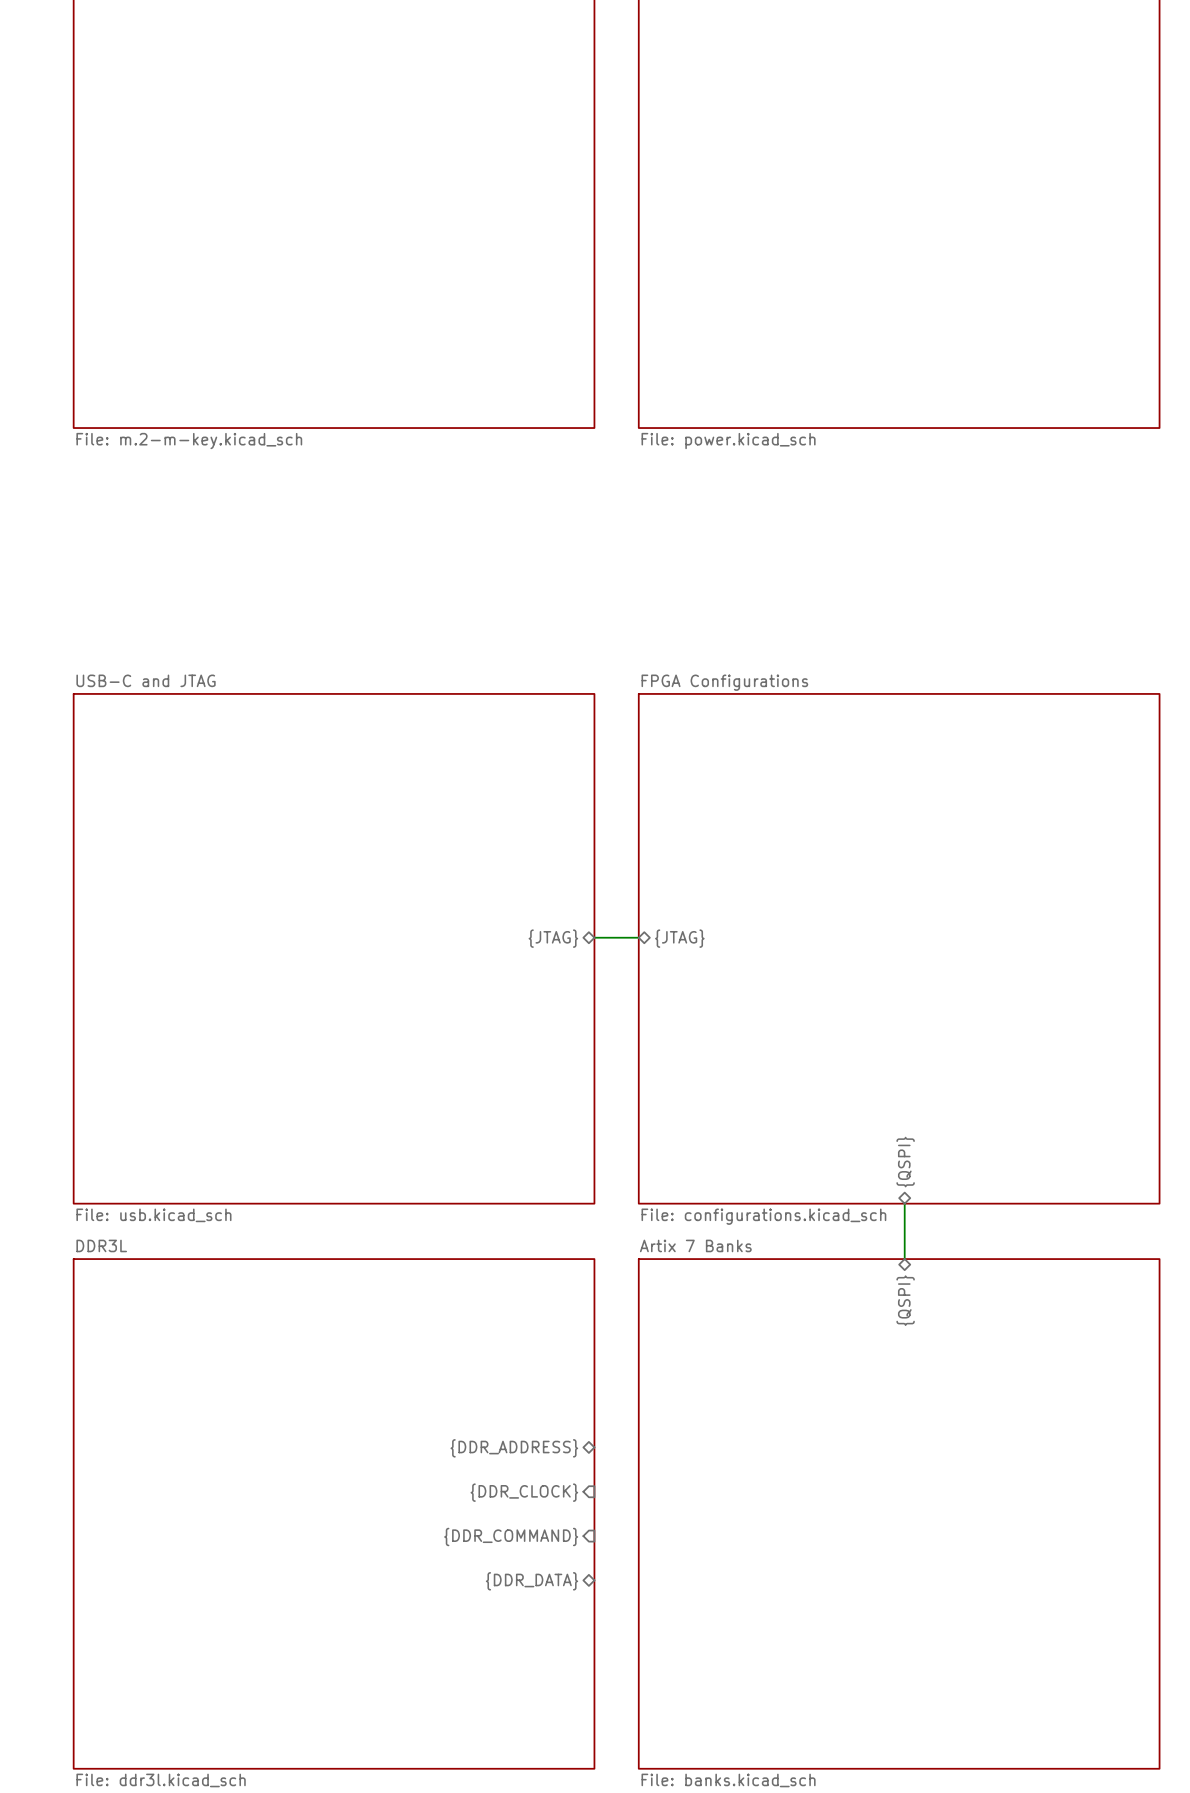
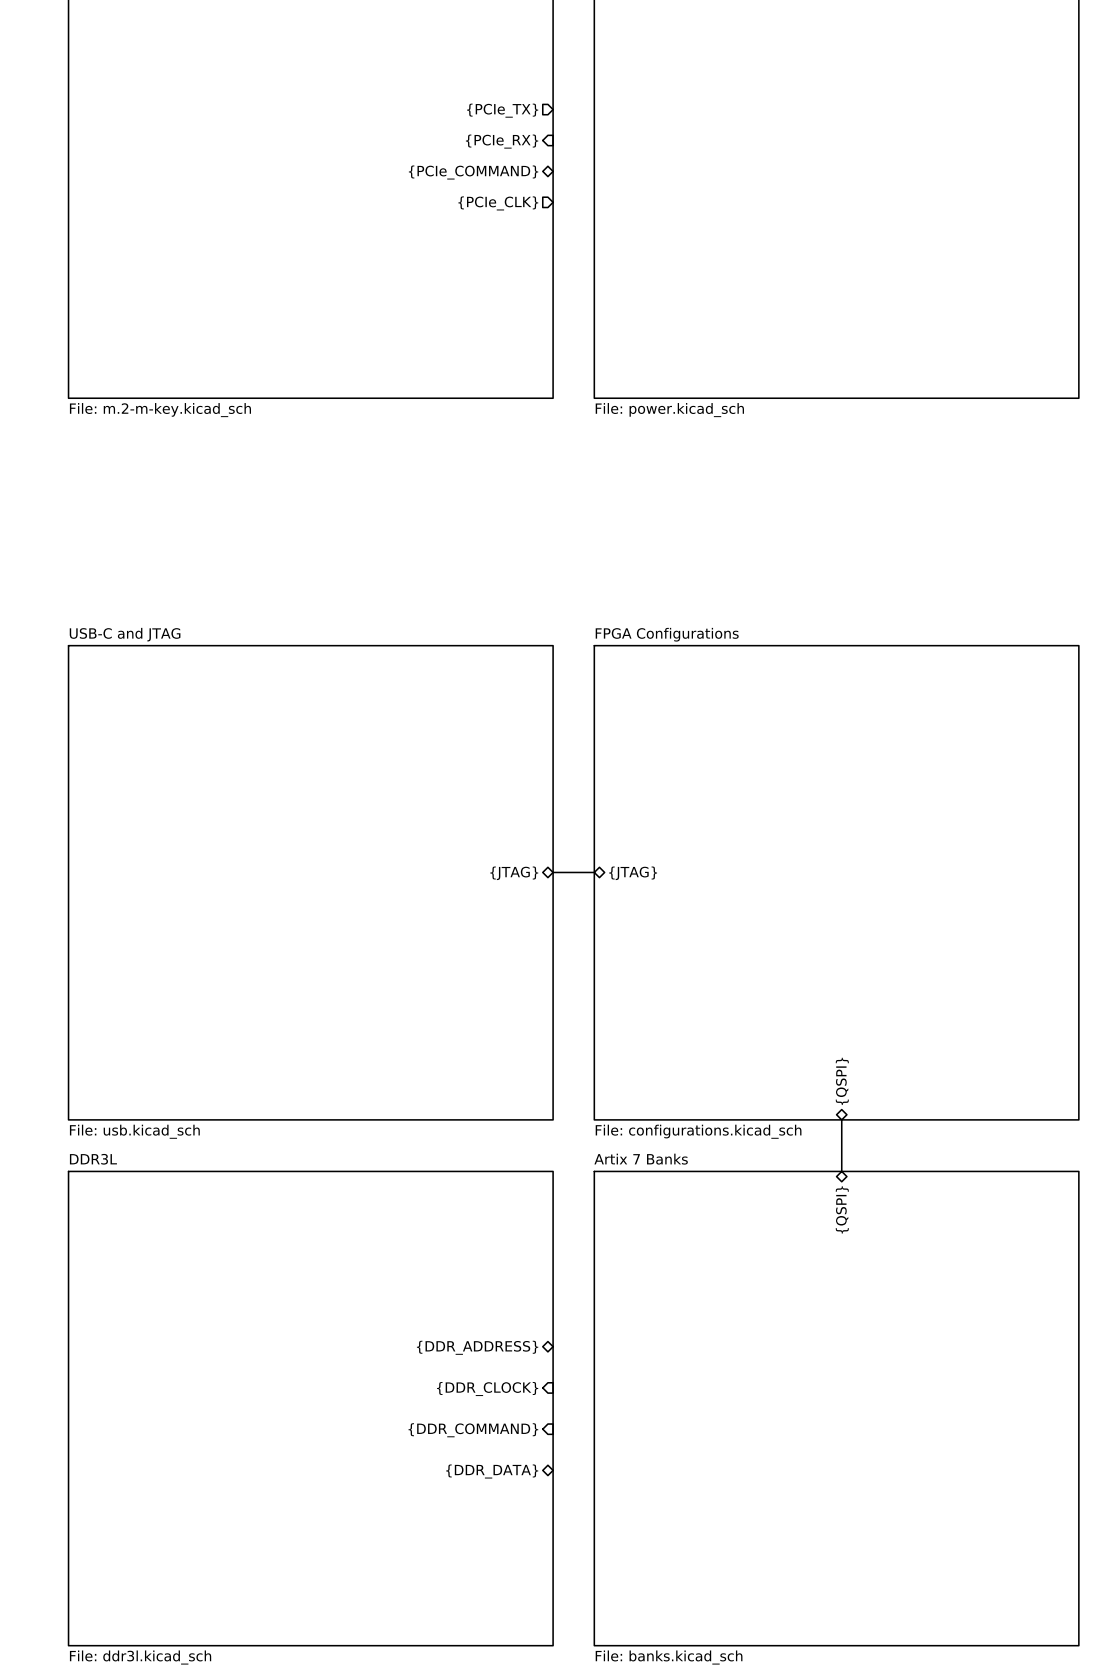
sheet pin: none -> {PCIe_TX} (502, 110)
sheet pin: none -> {PCIe_RX} (502, 141)
sheet pin: none -> {PCIe_COMMAND} (473, 172)
sheet pin: none -> {PCIe_CLK} (498, 203)

